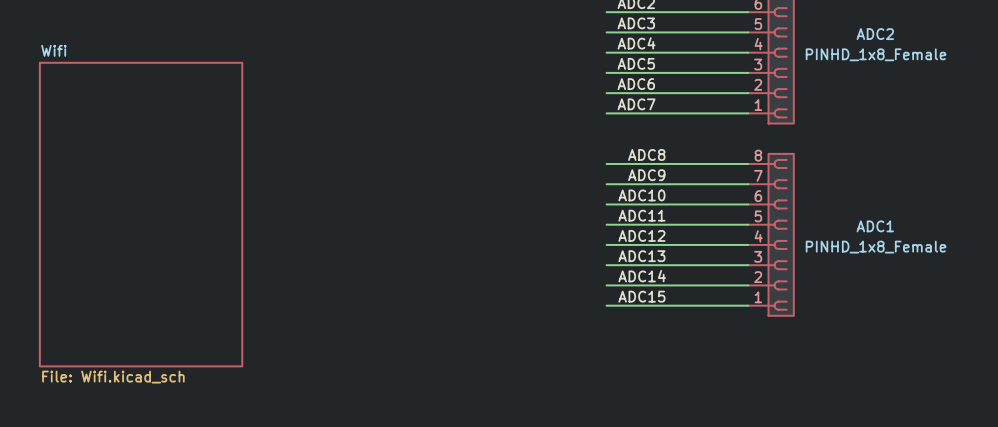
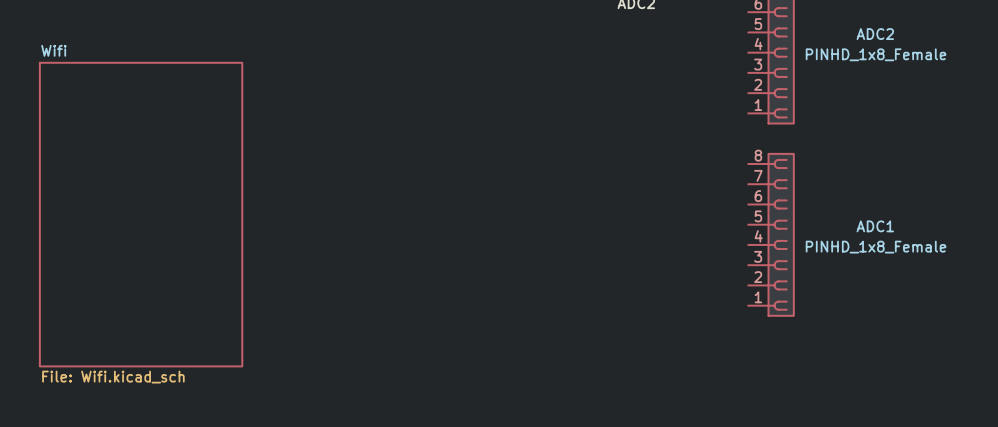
wire: (606, 12) (748, 12) -> none
label: ADC3 (636, 23) -> none
wire: (606, 32) (748, 32) -> none
label: ADC4 (636, 43) -> none
wire: (606, 52) (748, 52) -> none
label: ADC5 (636, 63) -> none
wire: (606, 72) (748, 72) -> none
label: ADC6 (636, 84) -> none
wire: (606, 93) (748, 93) -> none
label: ADC7 (636, 104) -> none
wire: (606, 113) (748, 113) -> none
label: ADC8 (646, 154) -> none
wire: (606, 163) (748, 163) -> none
label: ADC9 (646, 175) -> none
wire: (606, 184) (748, 184) -> none
label: ADC10 (641, 195) -> none
wire: (606, 204) (748, 204) -> none
label: ADC11 (641, 215) -> none
wire: (606, 224) (748, 224) -> none
label: ADC12 (641, 235) -> none
wire: (606, 244) (748, 244) -> none
label: ADC13 (641, 256) -> none
wire: (606, 265) (748, 265) -> none
label: ADC14 (642, 276) -> none
wire: (606, 285) (748, 285) -> none
label: ADC15 (641, 296) -> none
wire: (606, 305) (748, 305) -> none

